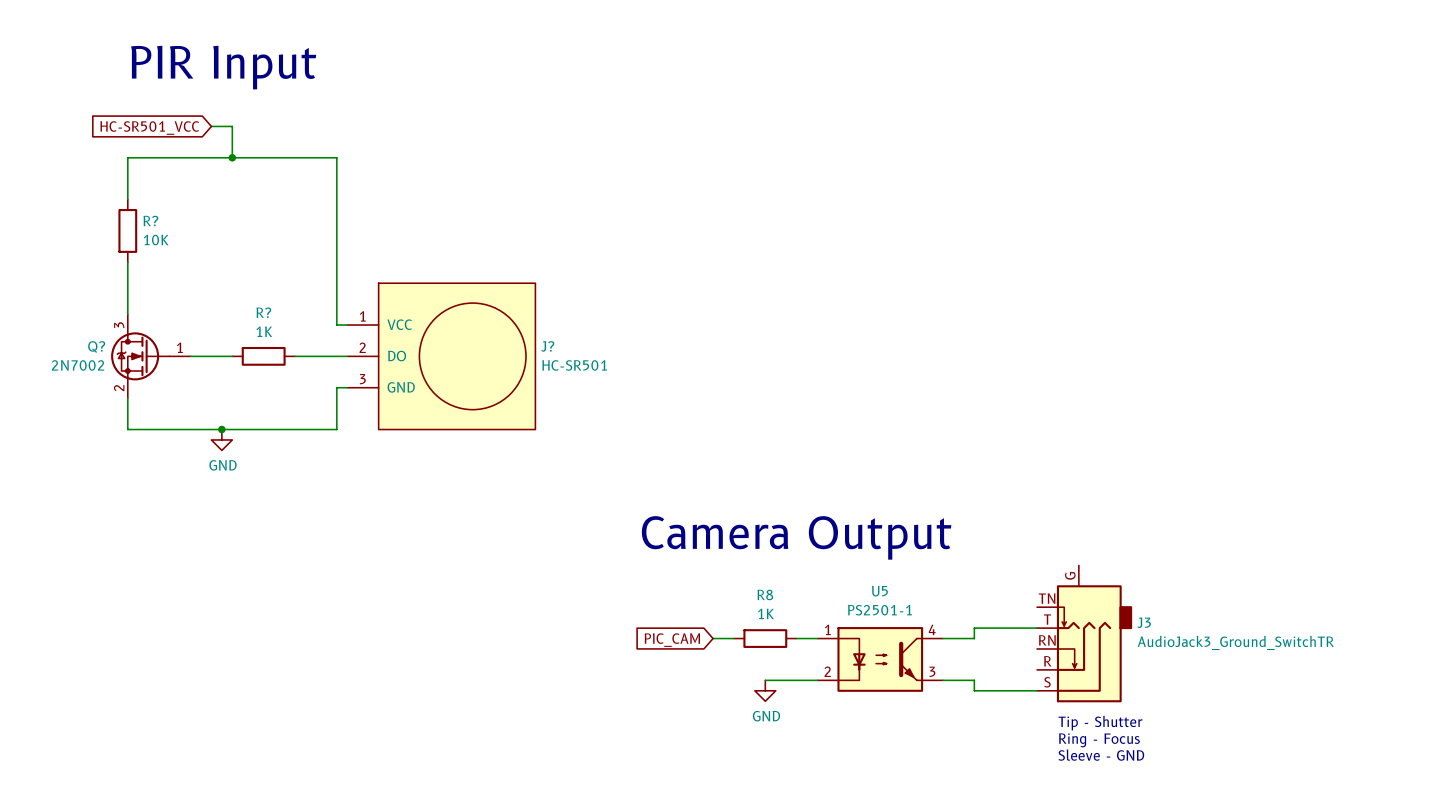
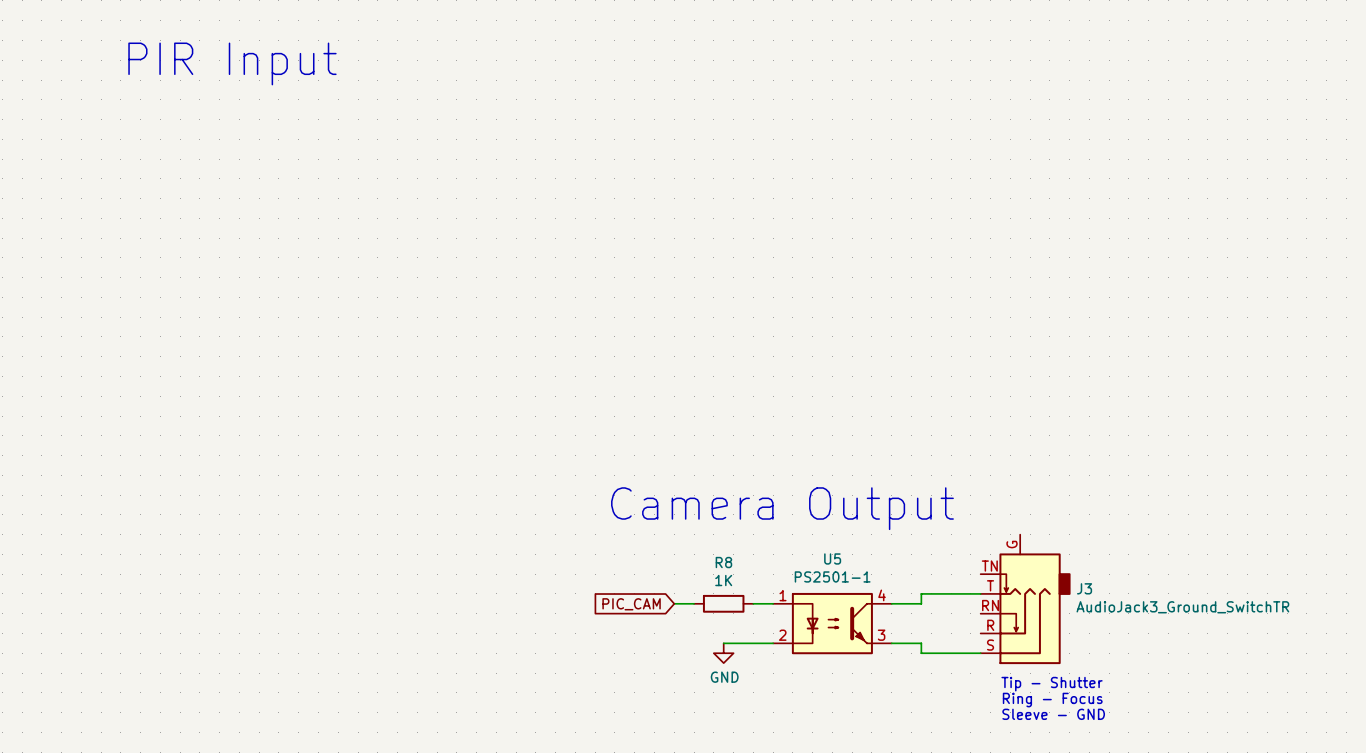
wire: (211, 126) (232, 126) (232, 157) -> none
global label: HC-SR501_VCC (149, 128) -> none
junction: (232, 157) -> none
wire: (127, 199) (127, 157) (336, 157) (336, 325) (347, 325) -> none
R?: 10K (127, 230) -> none
wire: (127, 262) (127, 314) -> none
Q?: 2N7002 (150, 356) -> none
wire: (190, 356) (232, 356) -> none
R?: 1K (263, 356) -> none
wire: (295, 356) (347, 356) -> none
J?: HC-SR501 (441, 356) -> none
wire: (347, 387) (336, 387) (336, 429) (127, 429) (127, 398) -> none
junction: (221, 429) -> none
power symbol: GND (221, 439) -> none

